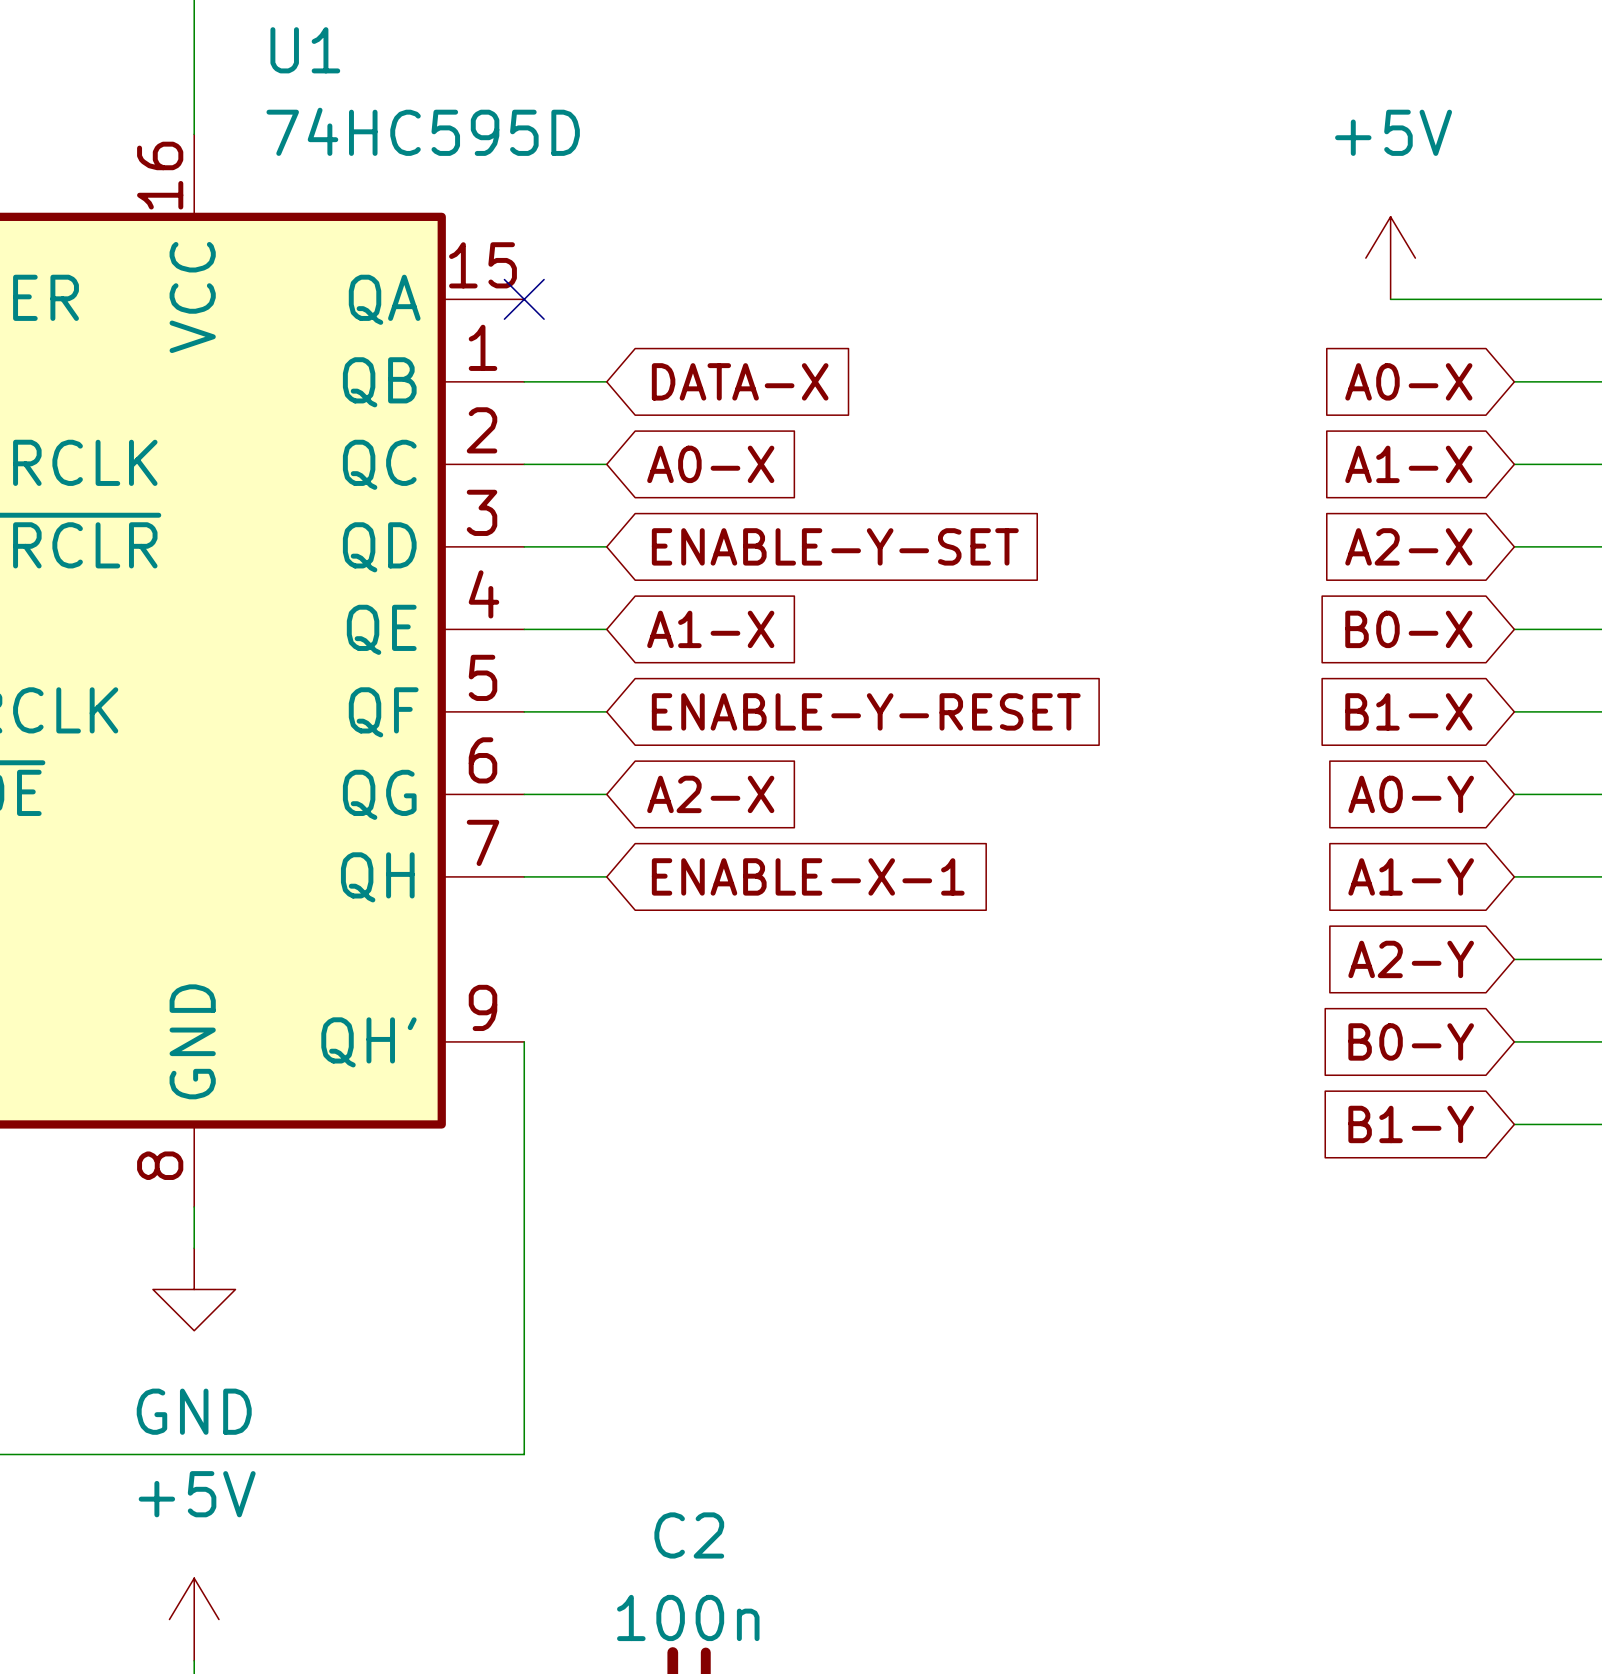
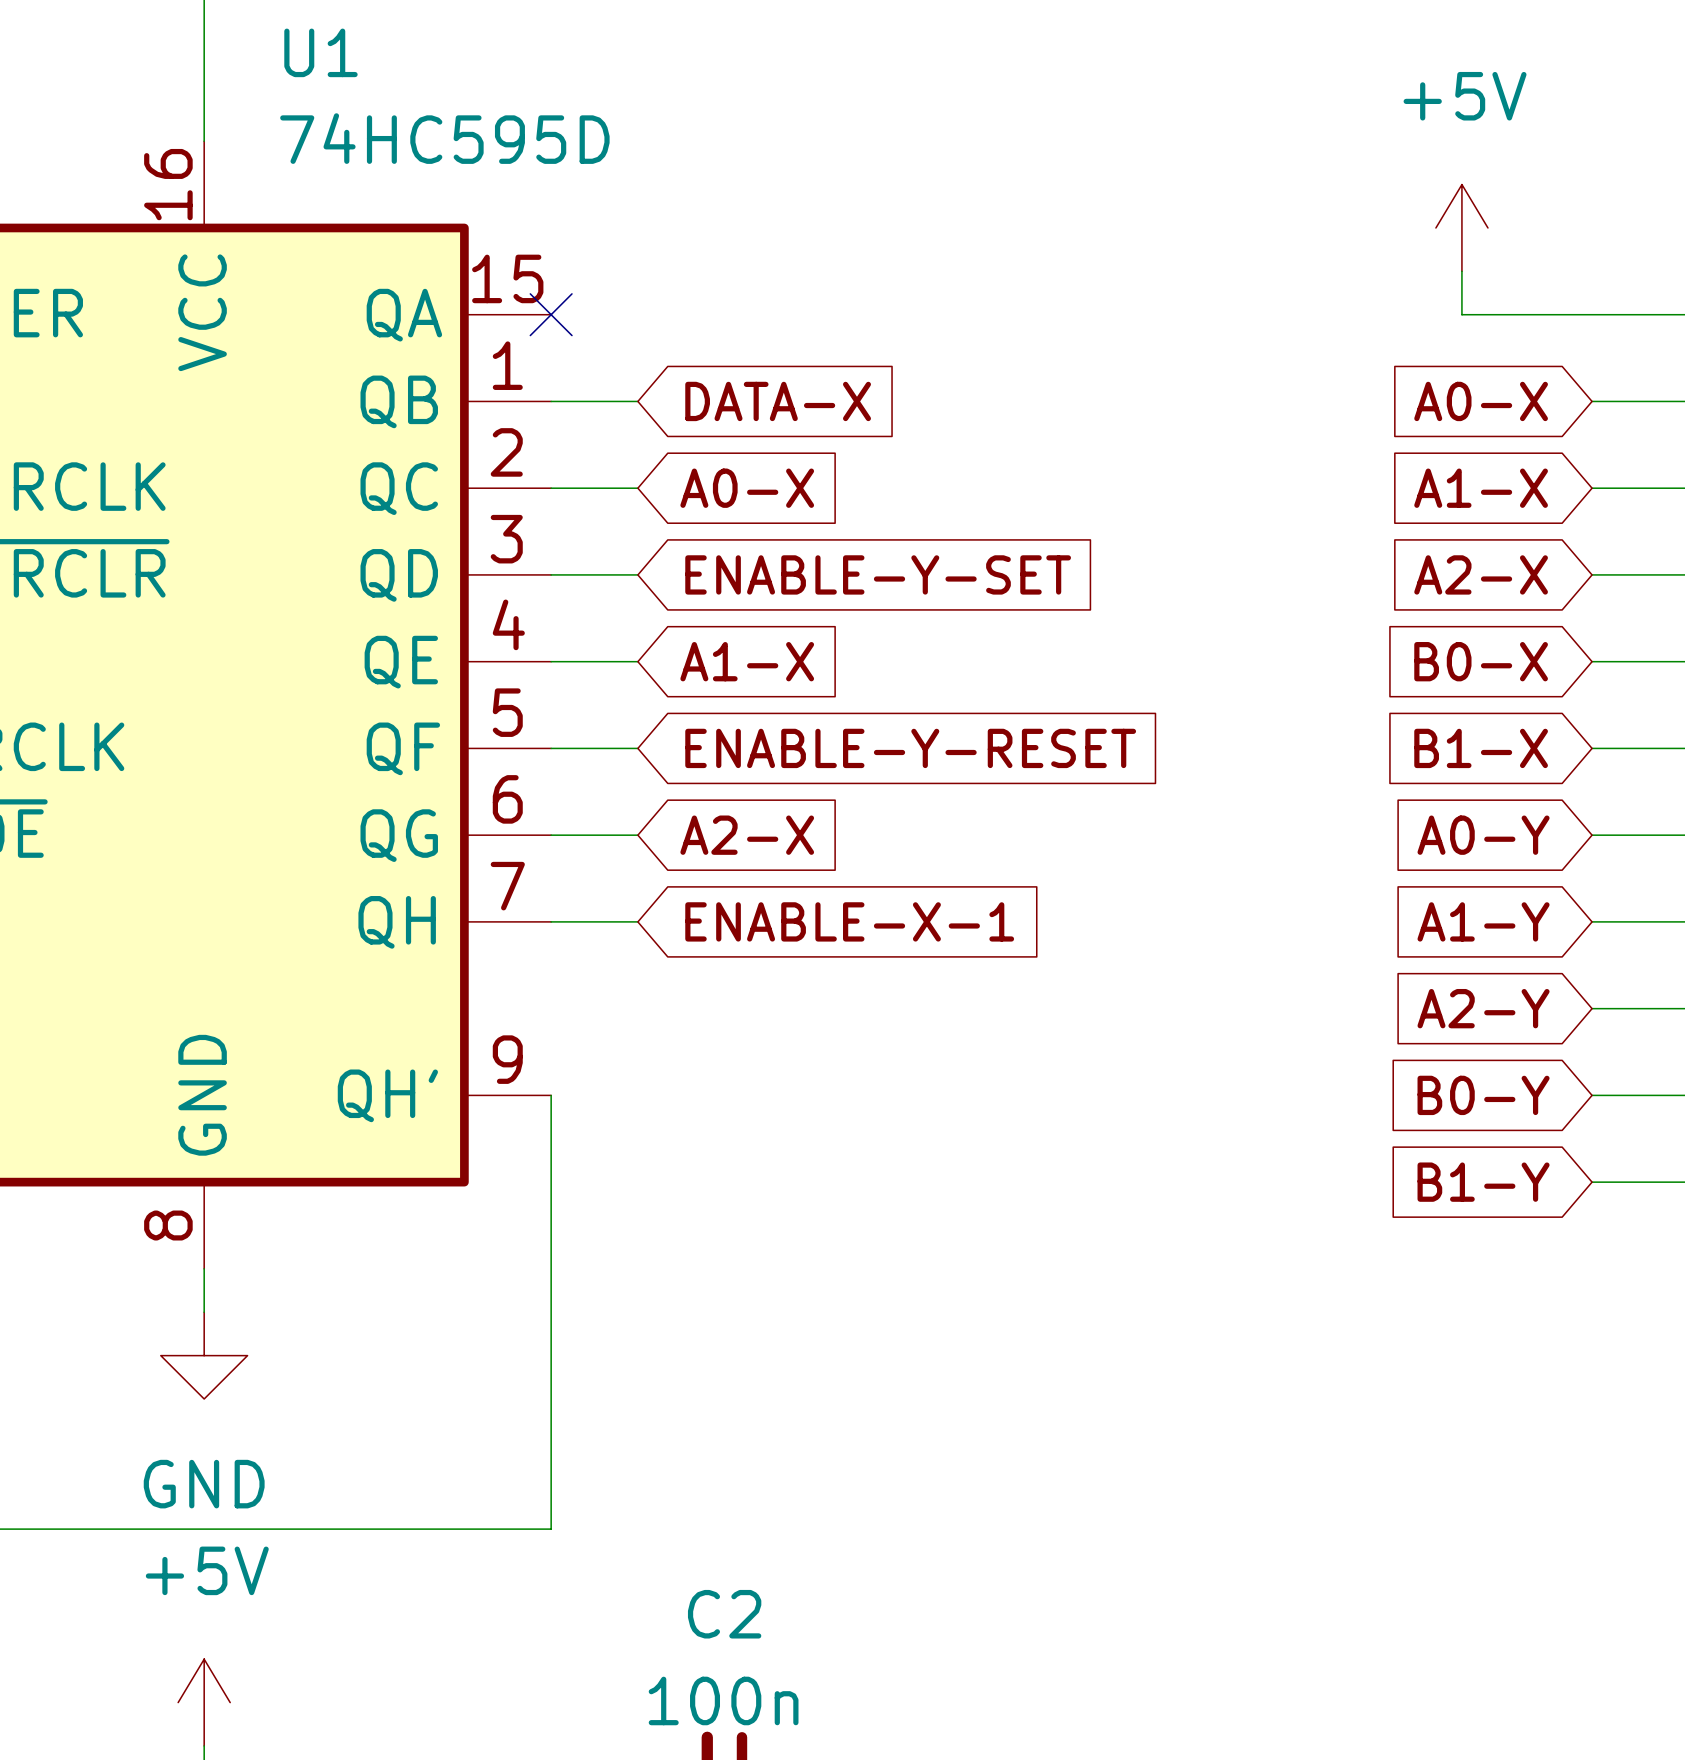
power symbol position: +5V (1390, 258) -> +5V (1461, 227)

